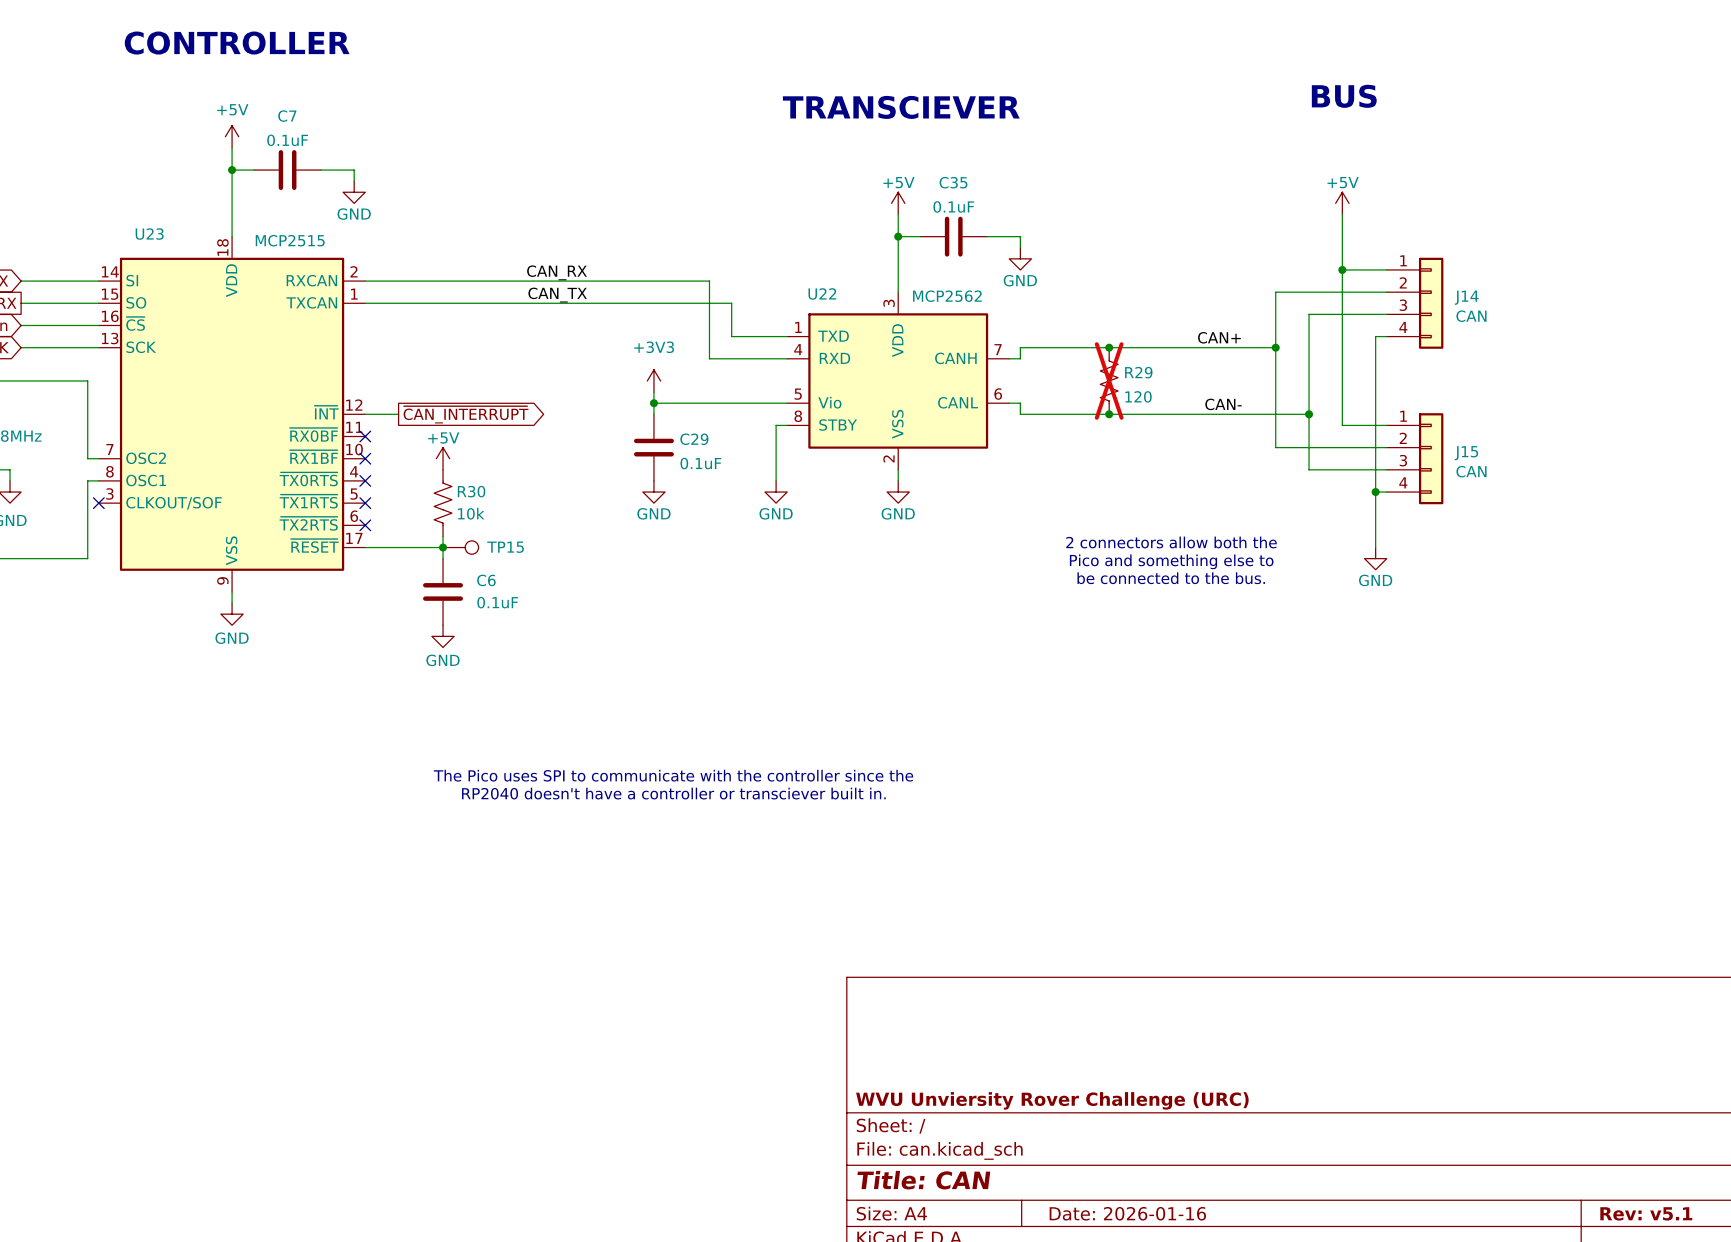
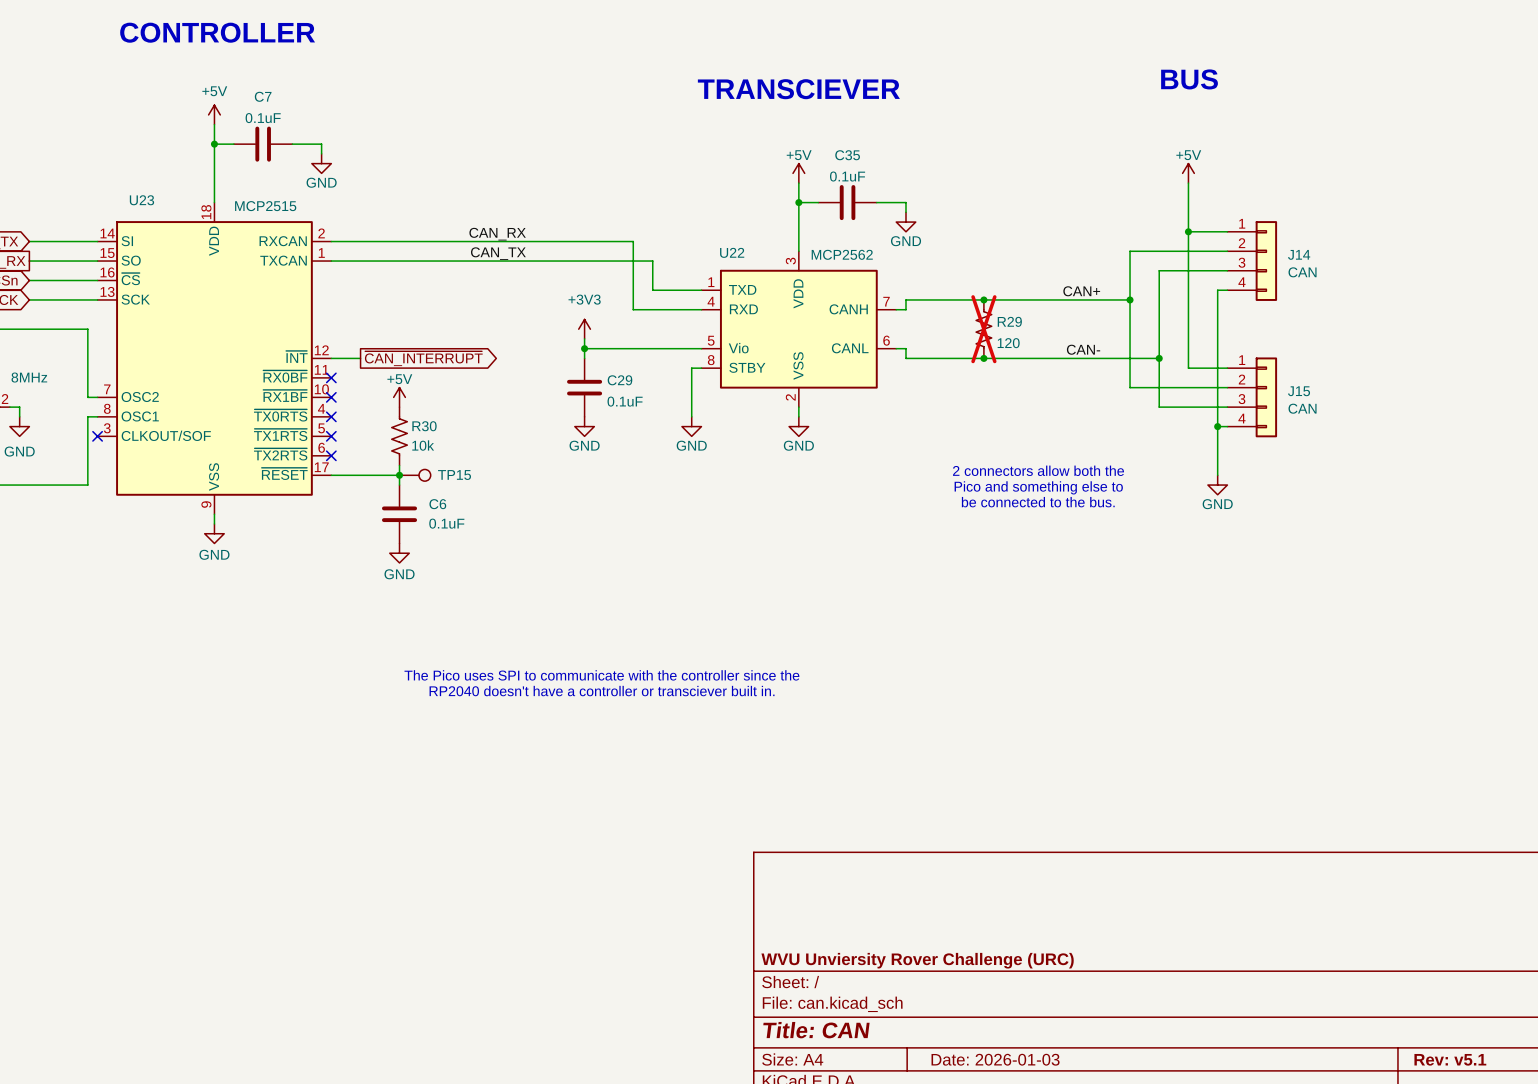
title block: Date: 2026-01-16 (1127, 1213) -> Date: 2026-01-03 (995, 1059)

